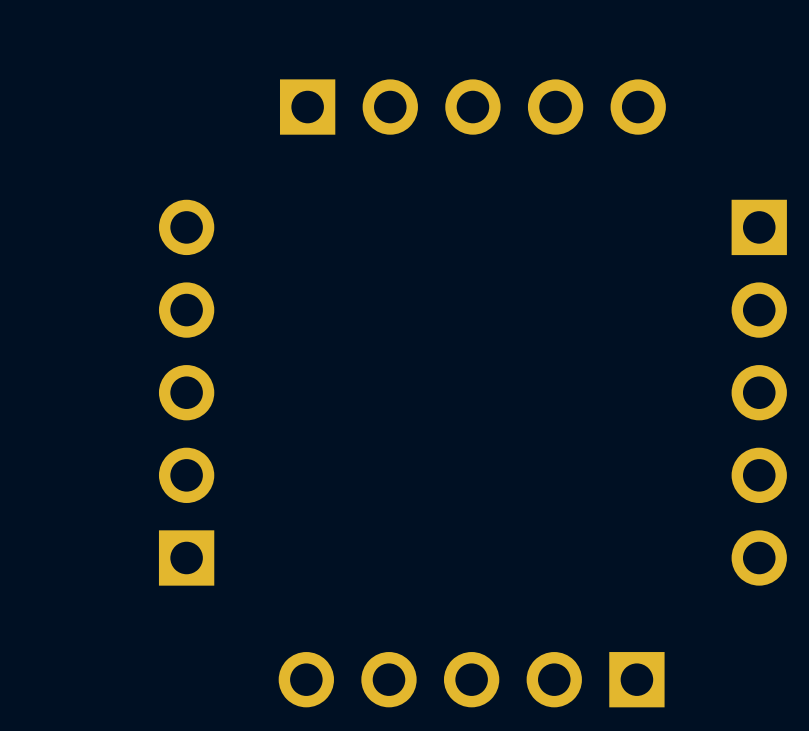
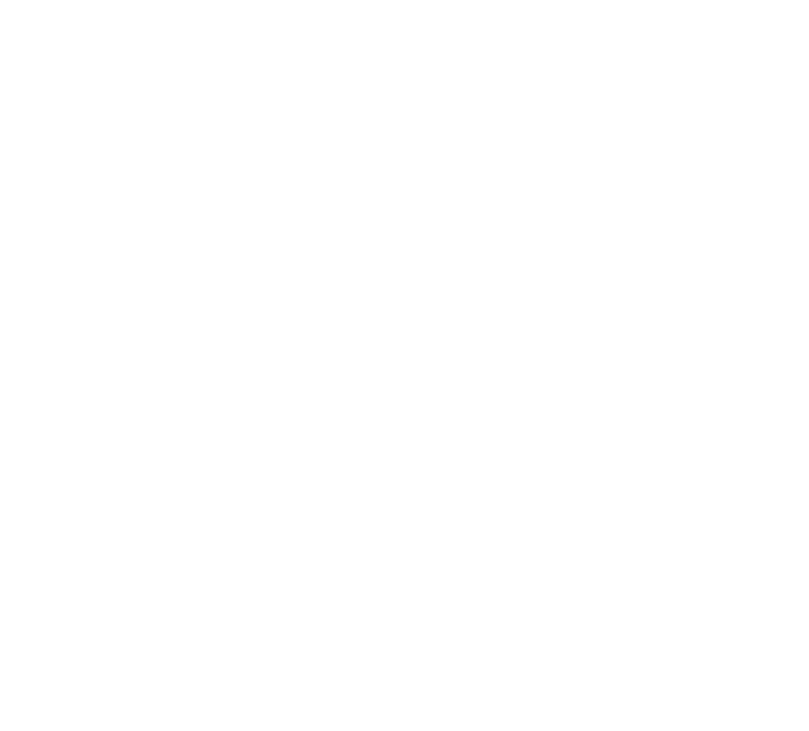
part: (472, 107) -> none
part: (186, 392) -> none
part: (759, 392) -> none
part: (471, 679) -> none

